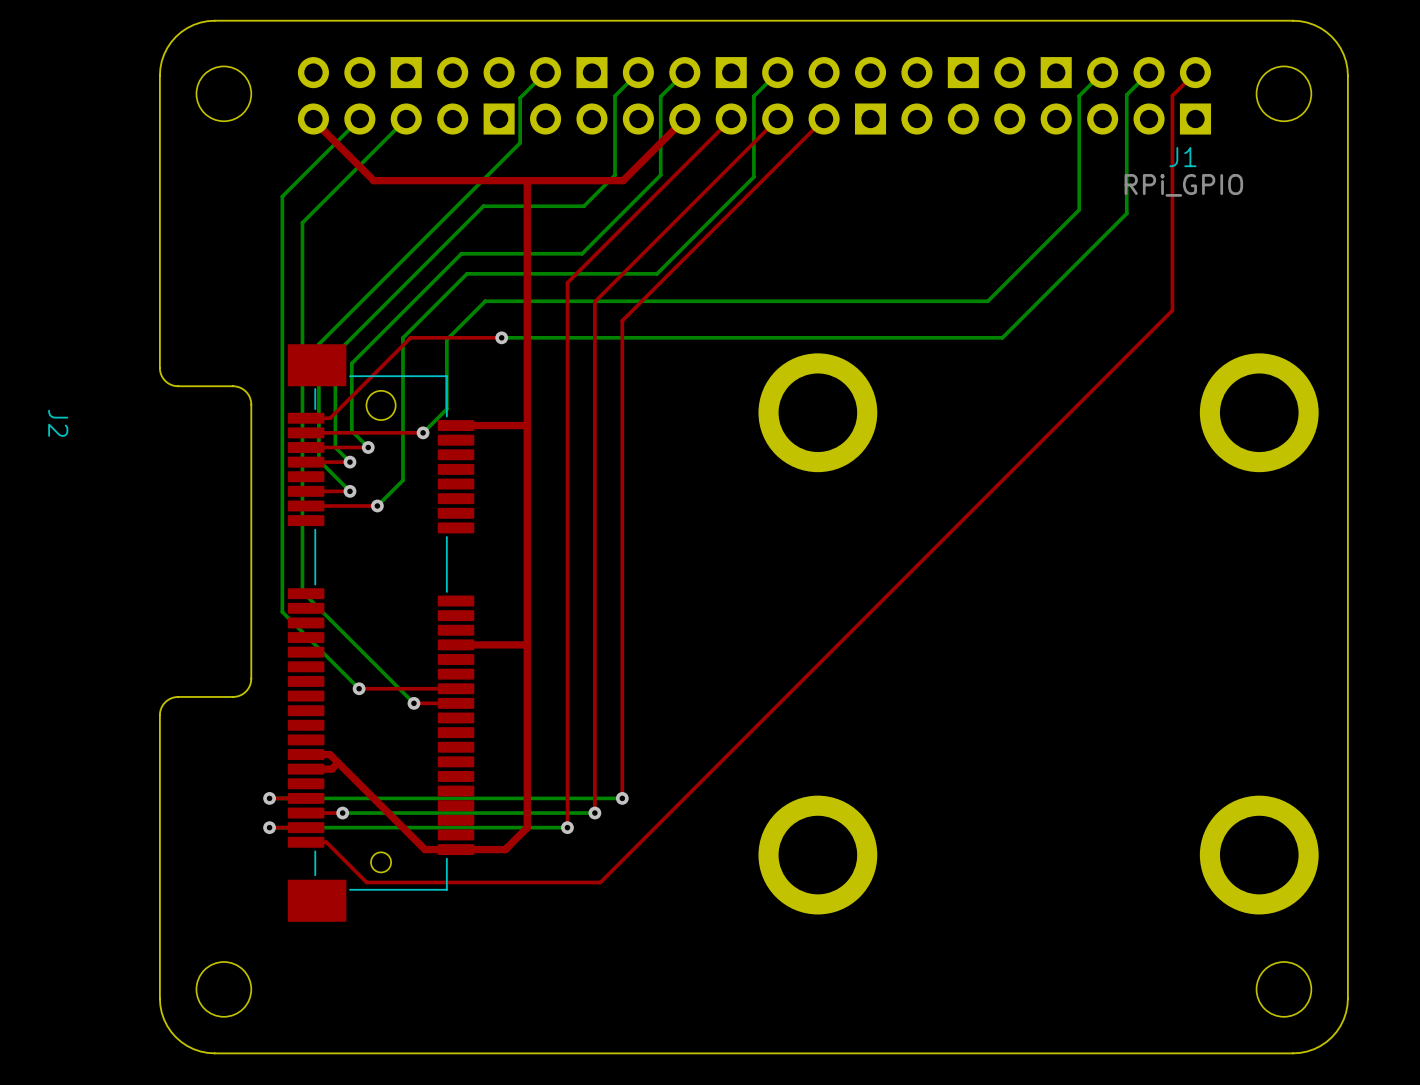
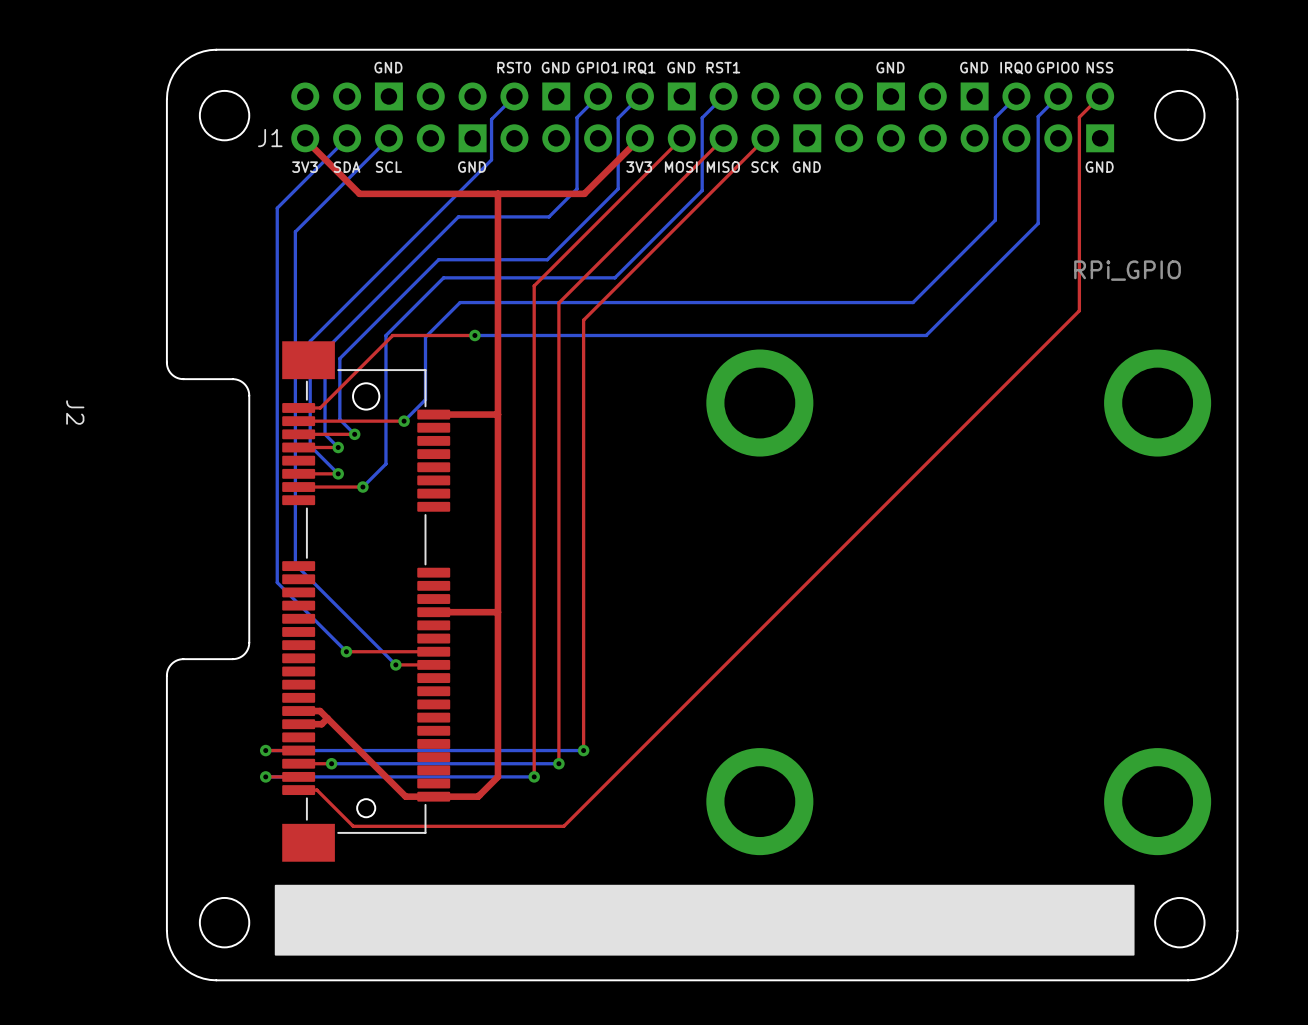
J1 footprint: [158, 19, 1349, 1055] -> [166, 48, 1239, 982]
J1 name position: J1 (1182, 157) -> J1 (270, 138)
J1 value position: RPi_GPIO (1183, 185) -> RPi_GPIO (1127, 270)
drawing: none -> [274, 884, 1135, 956]

